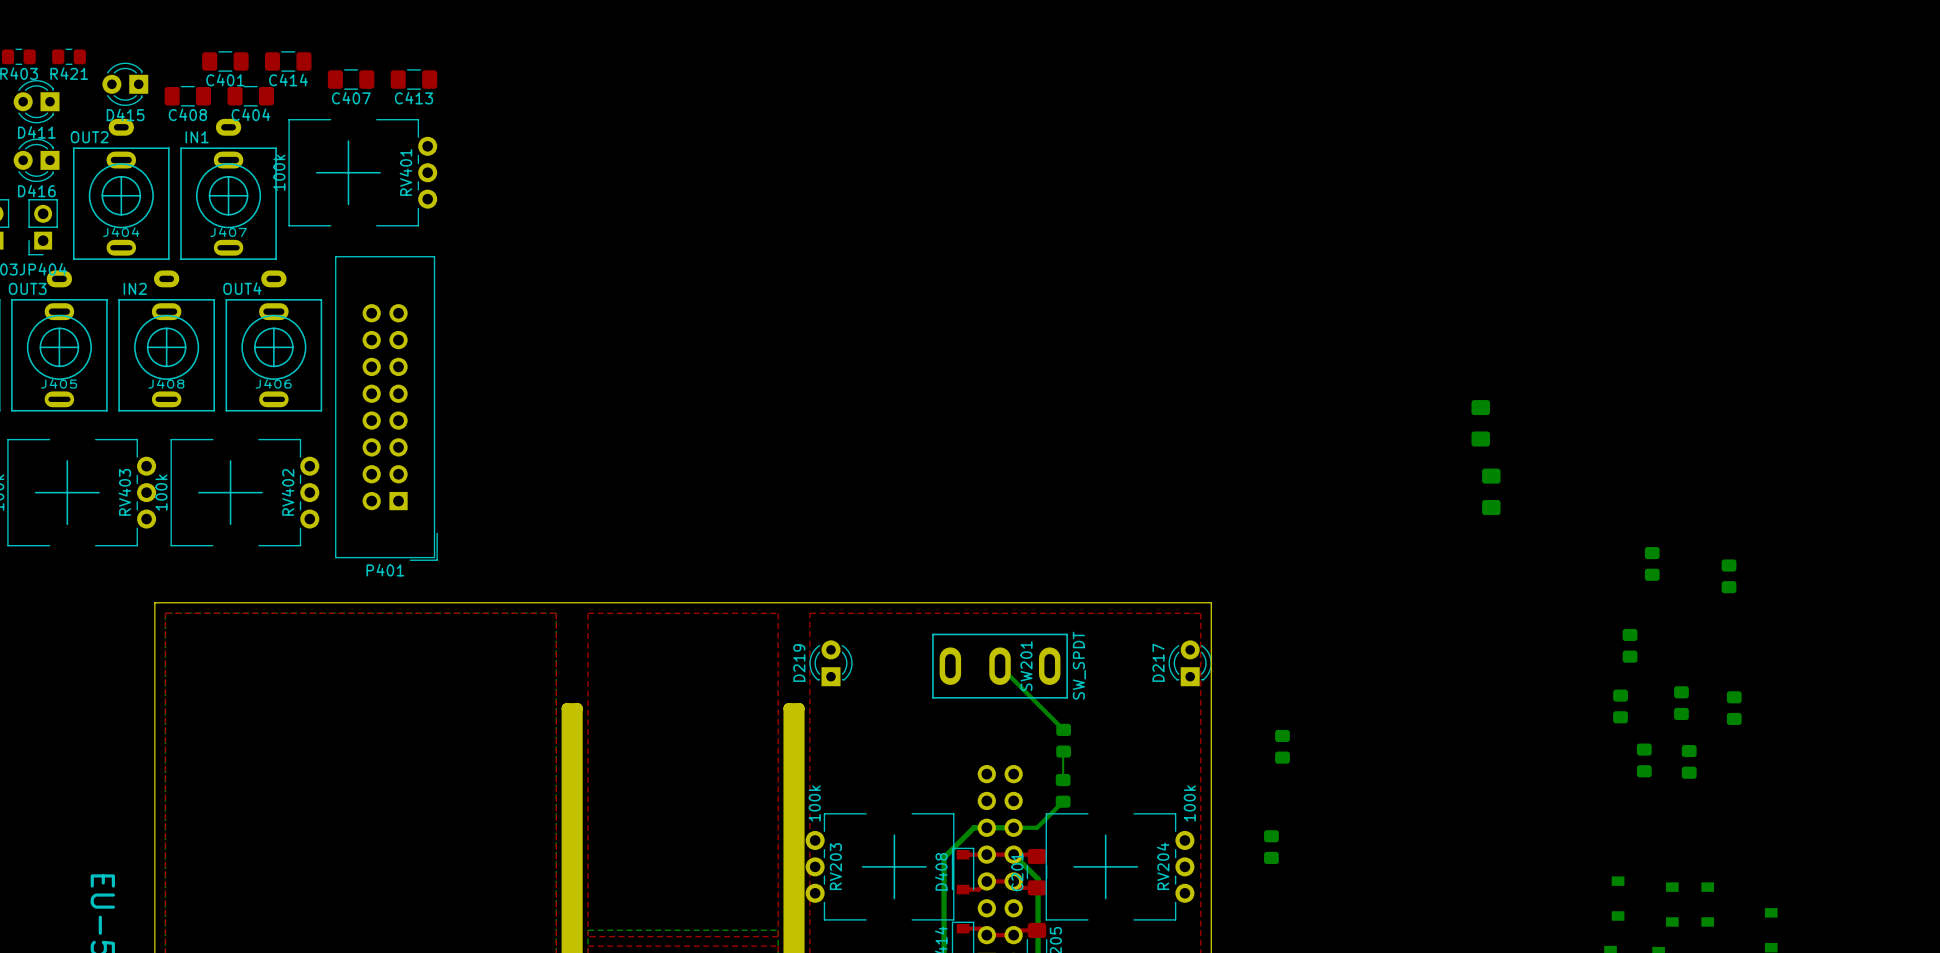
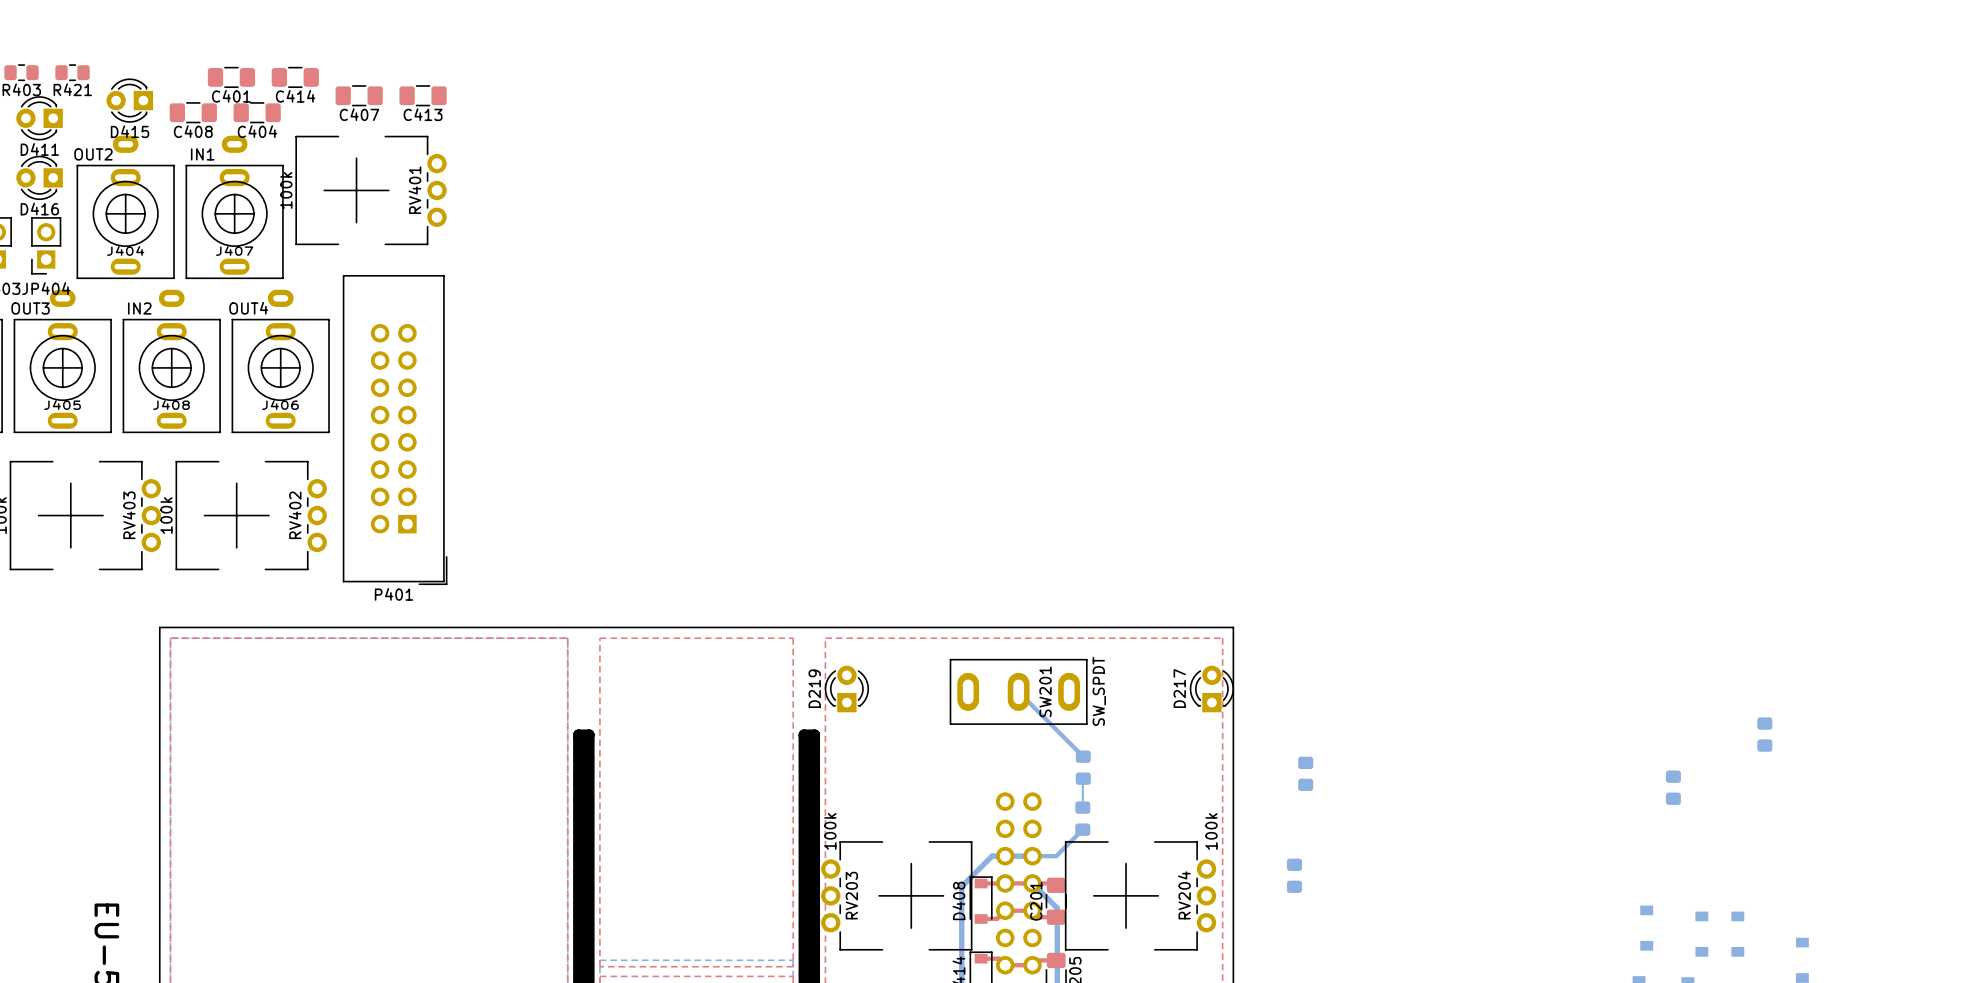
part: (1480, 423) -> none
part: (1491, 491) -> none
part: (1652, 563) -> none
part: (1729, 576) -> none
part: (1630, 645) -> none
part: (1681, 703) -> none
part: (1620, 706) -> none
part: (1689, 761) -> none

